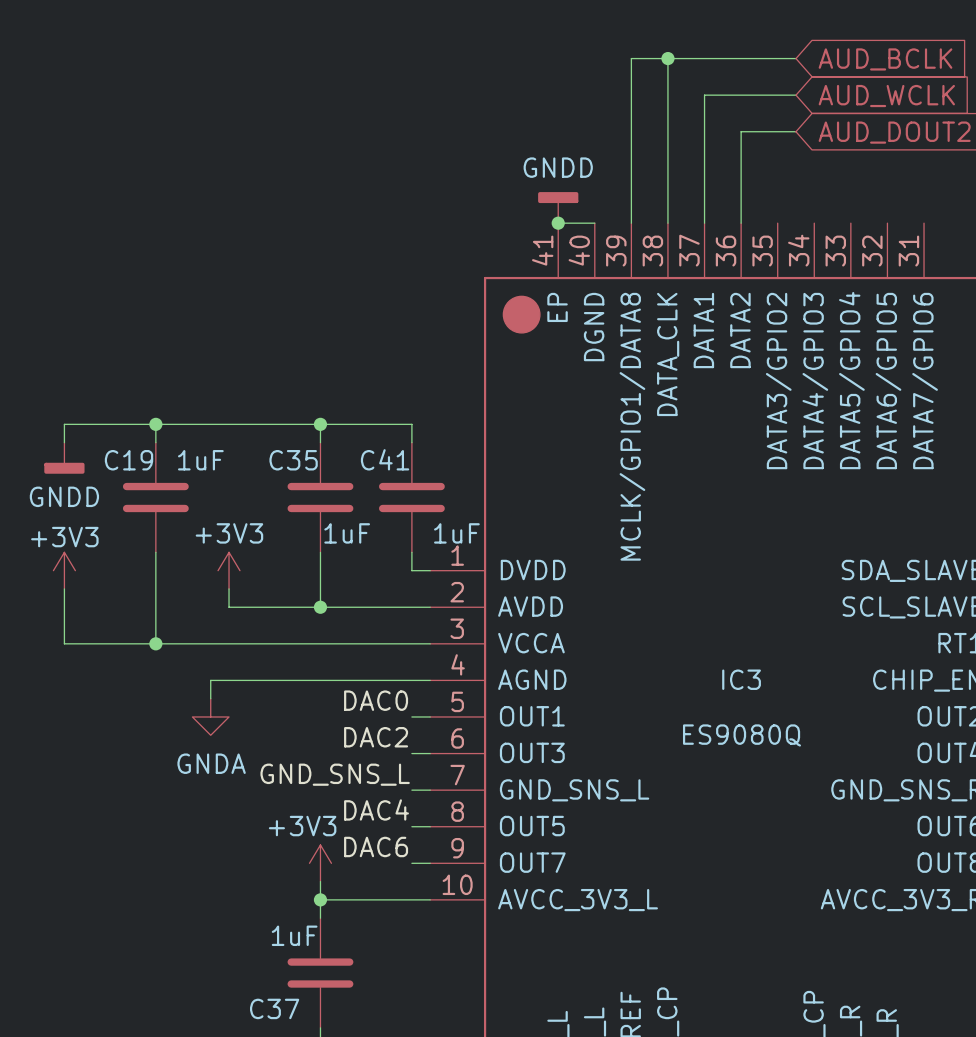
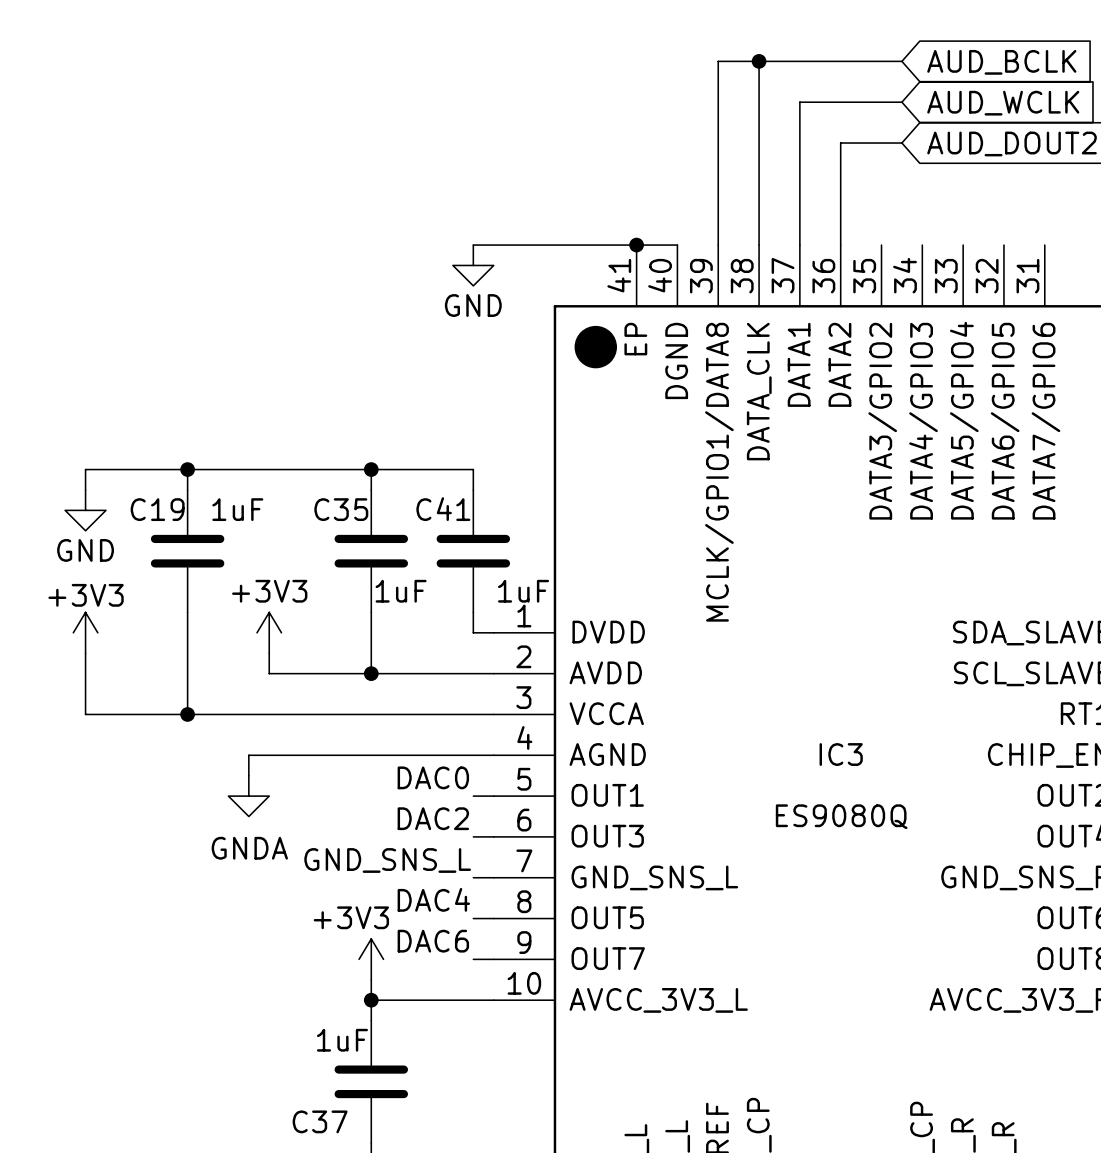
power symbol: GNDD (558, 207) -> none
wire: none -> (473, 245) (636, 245)
power symbol: none -> GND (473, 265)
power symbol: GNDD (64, 458) -> GND (85, 510)

